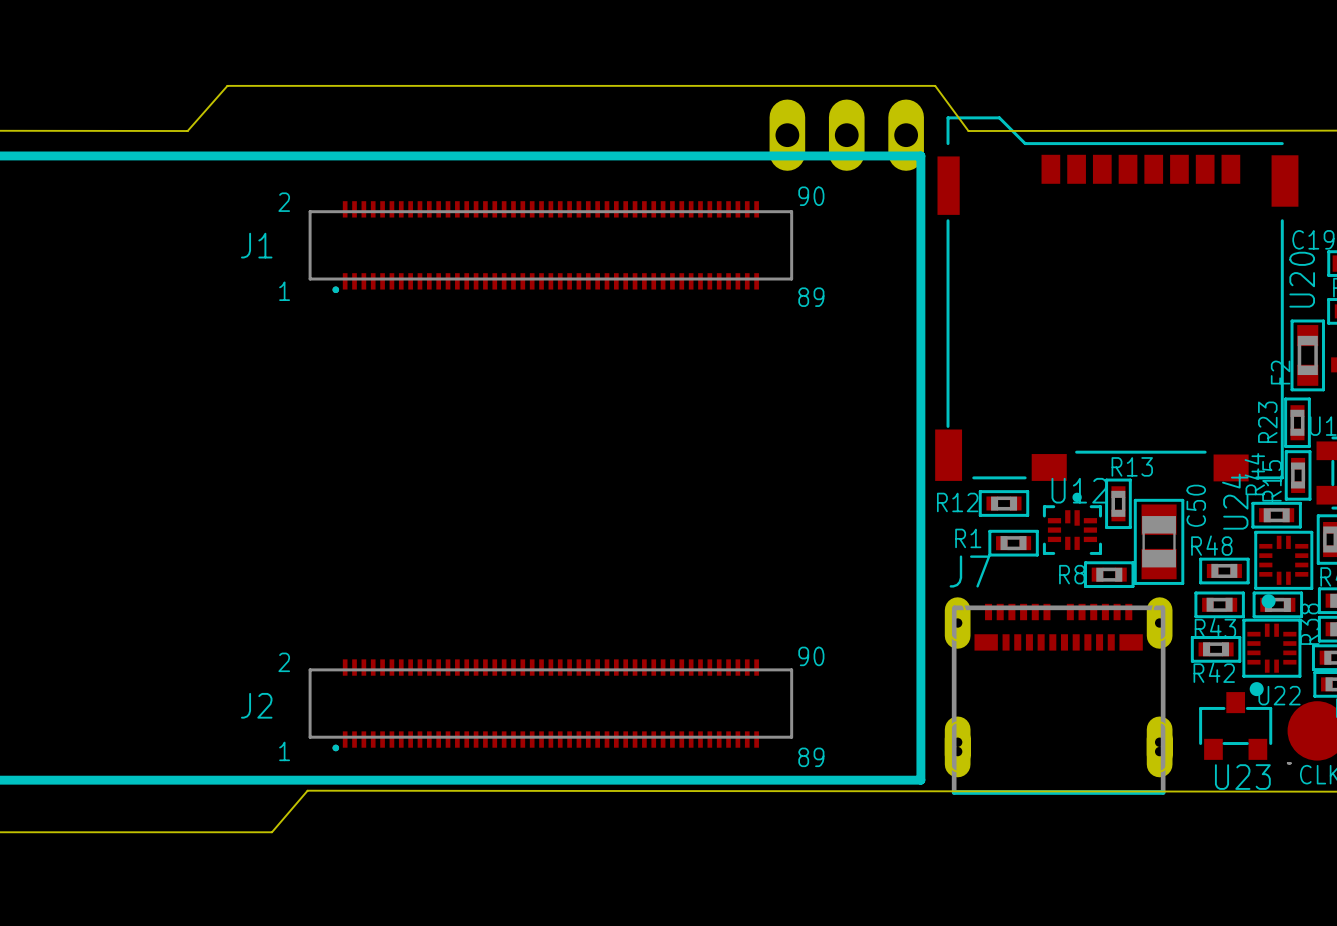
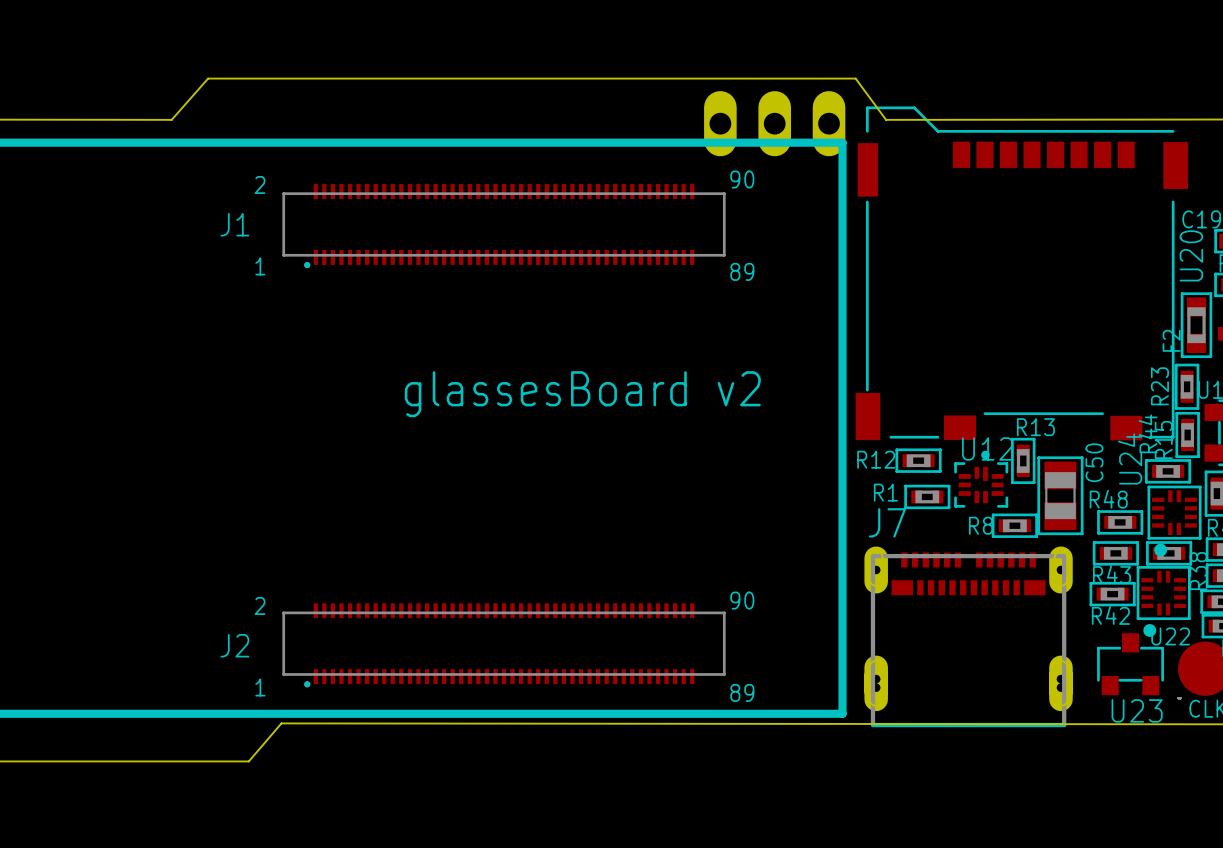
text: none -> glassesBoard v2 (582, 394)

